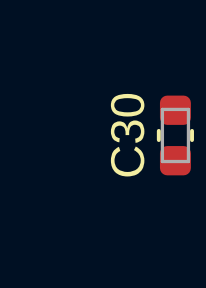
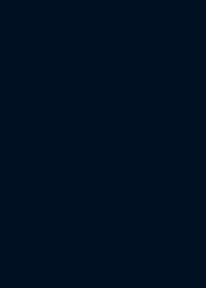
C30: (175, 135) -> none

